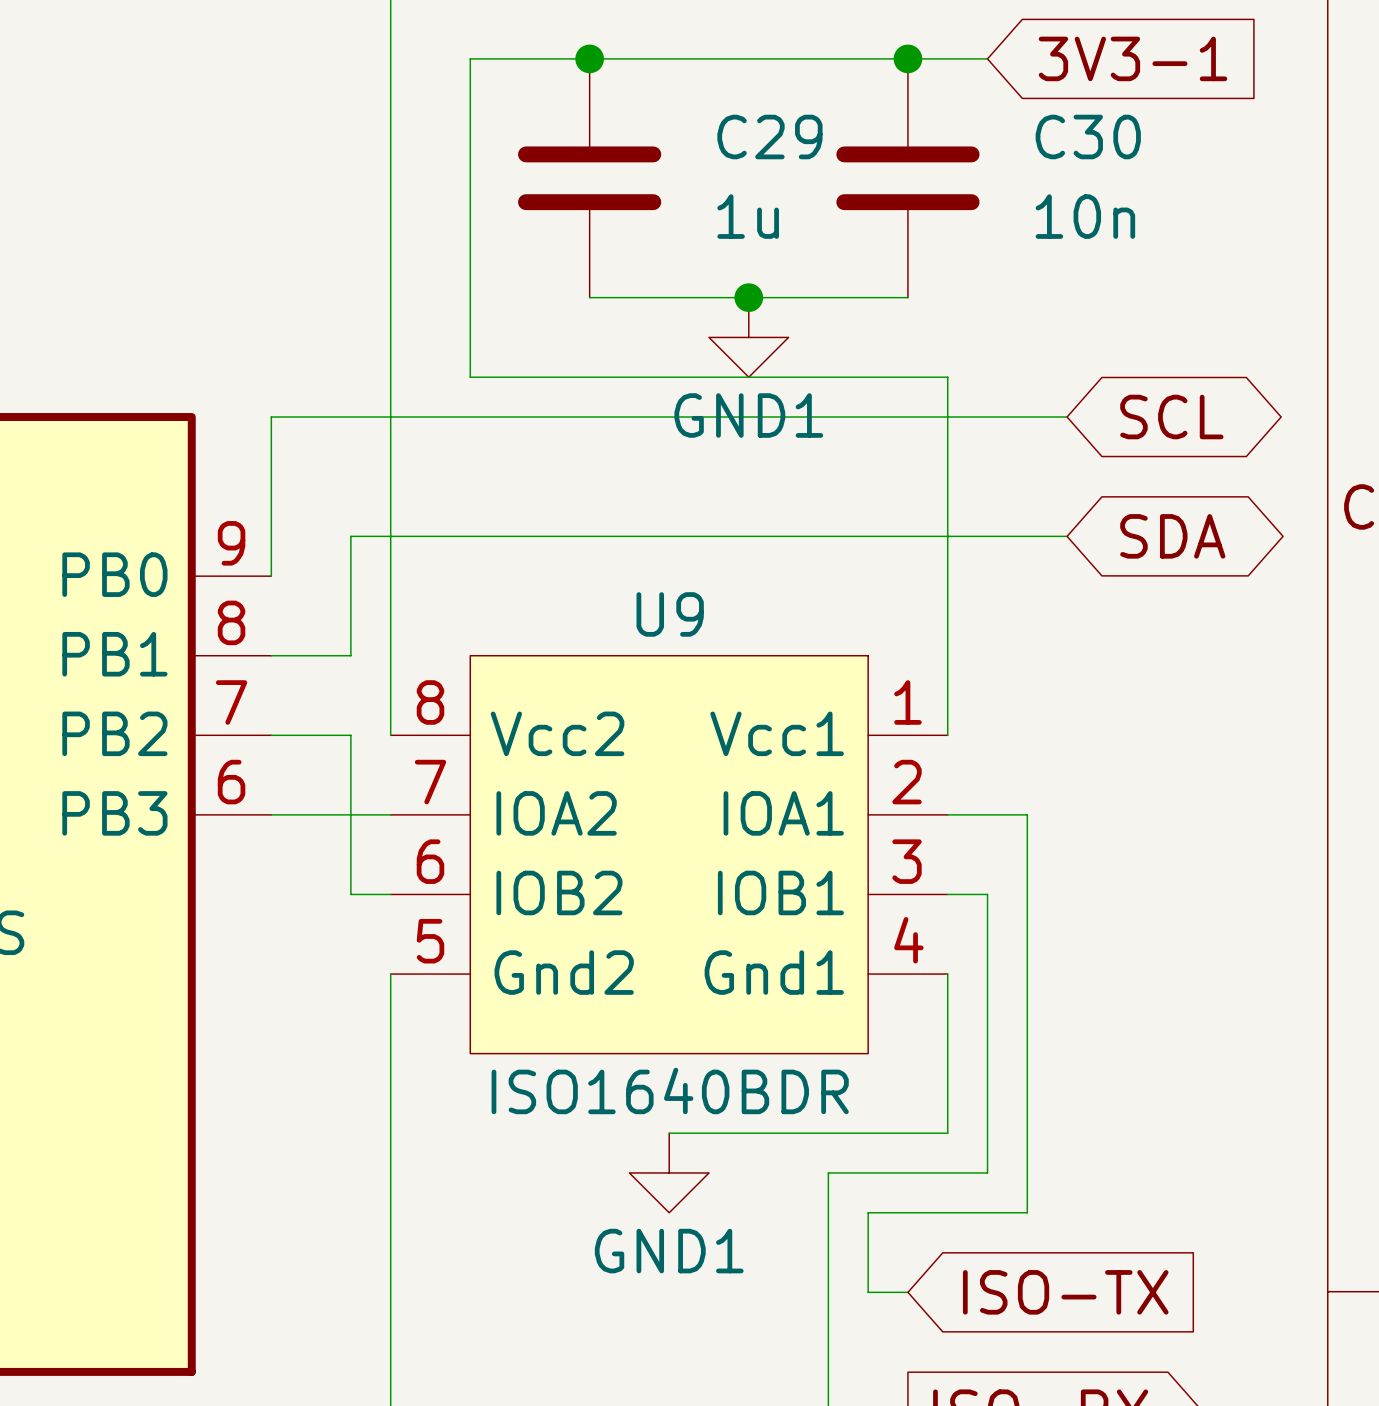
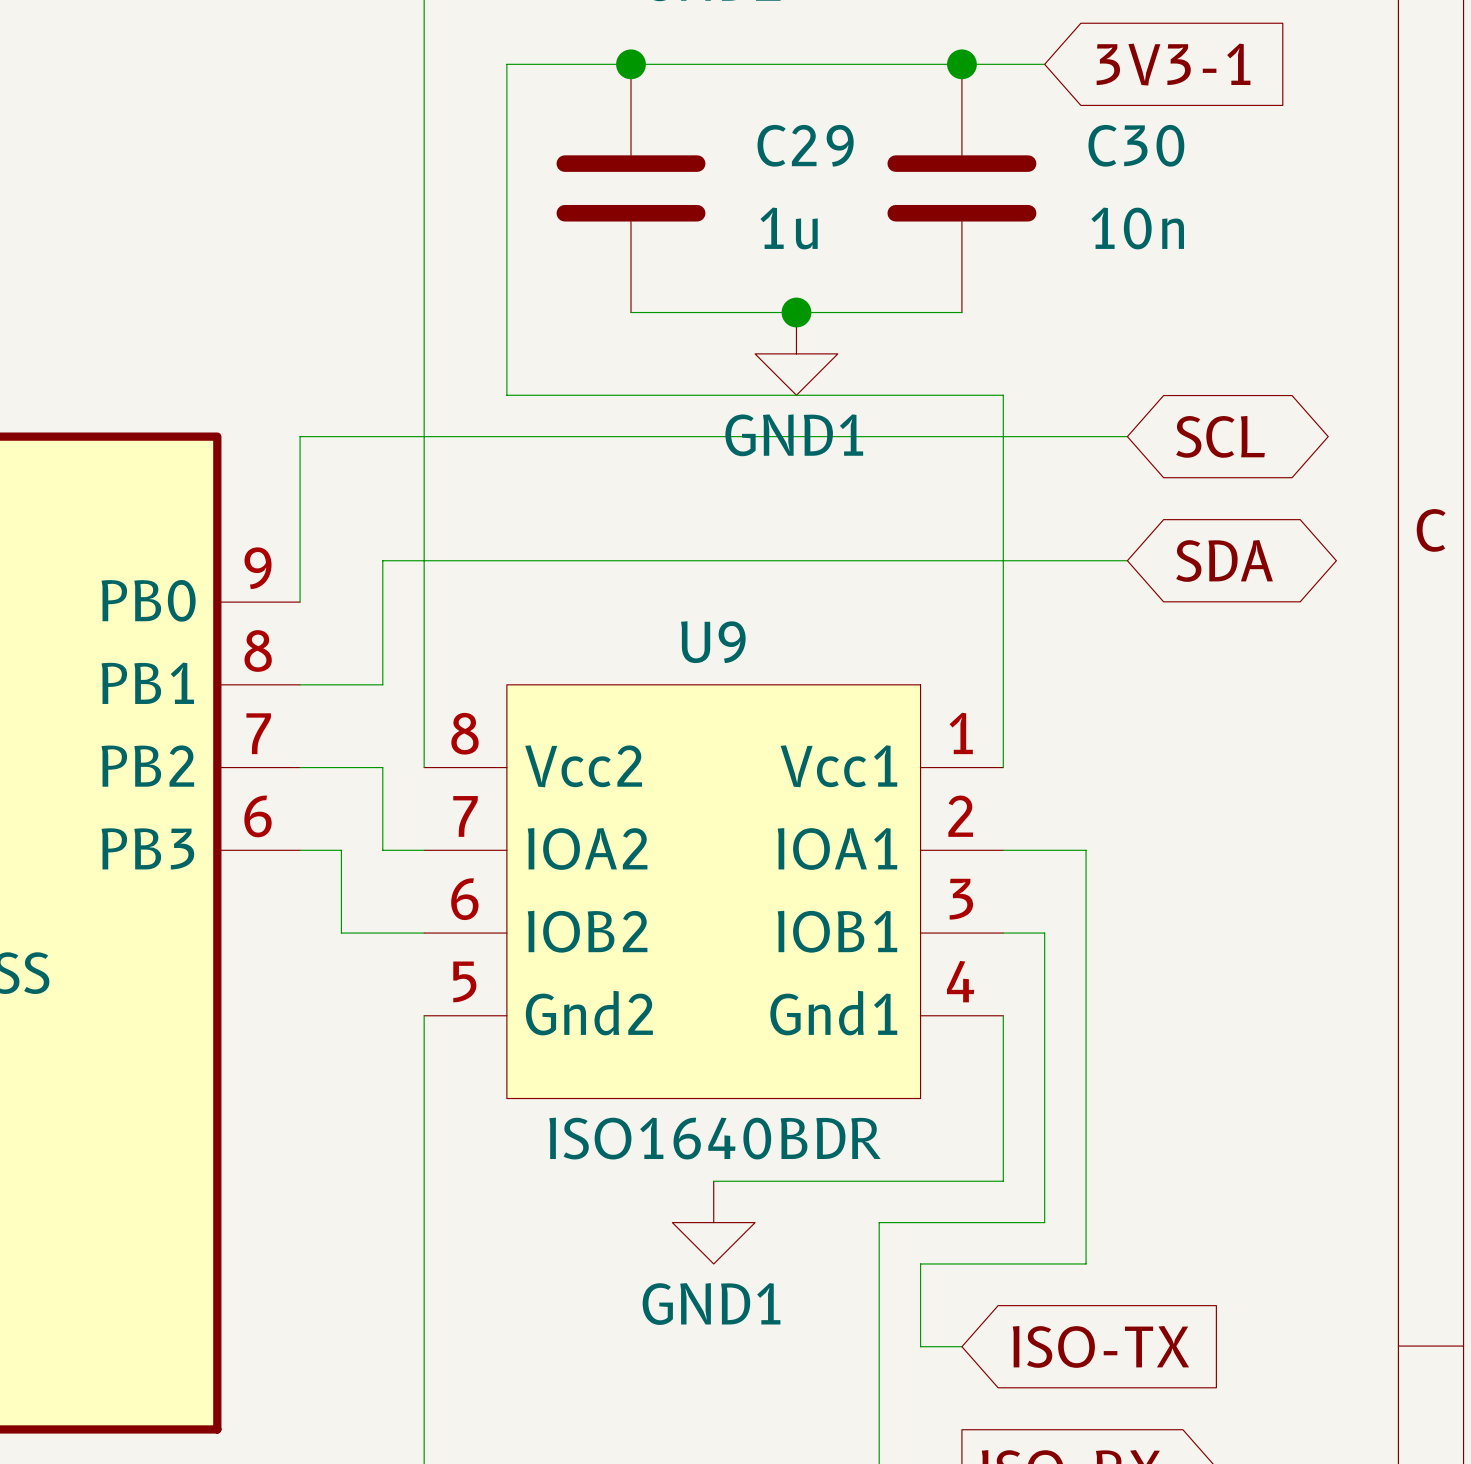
wire: (311, 814) (350, 814) (350, 894) -> (341, 850) (341, 933) (382, 933)

